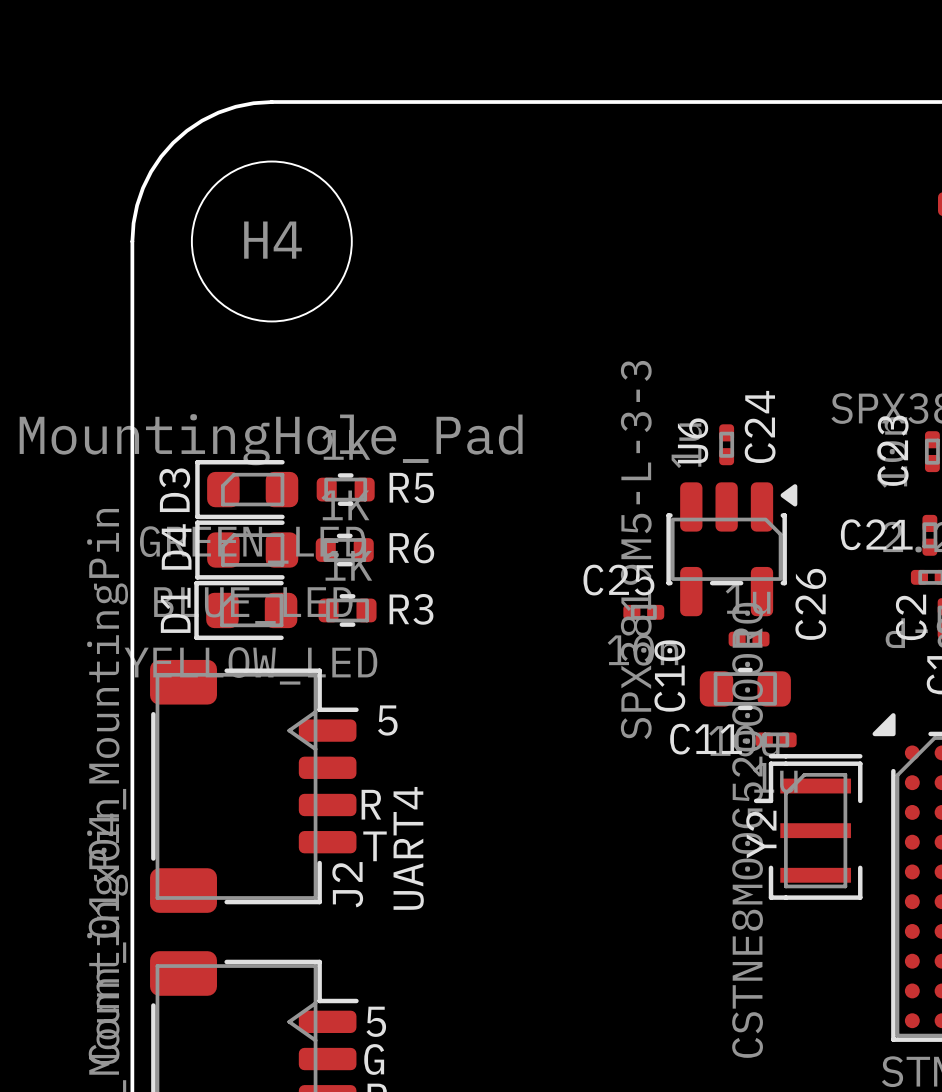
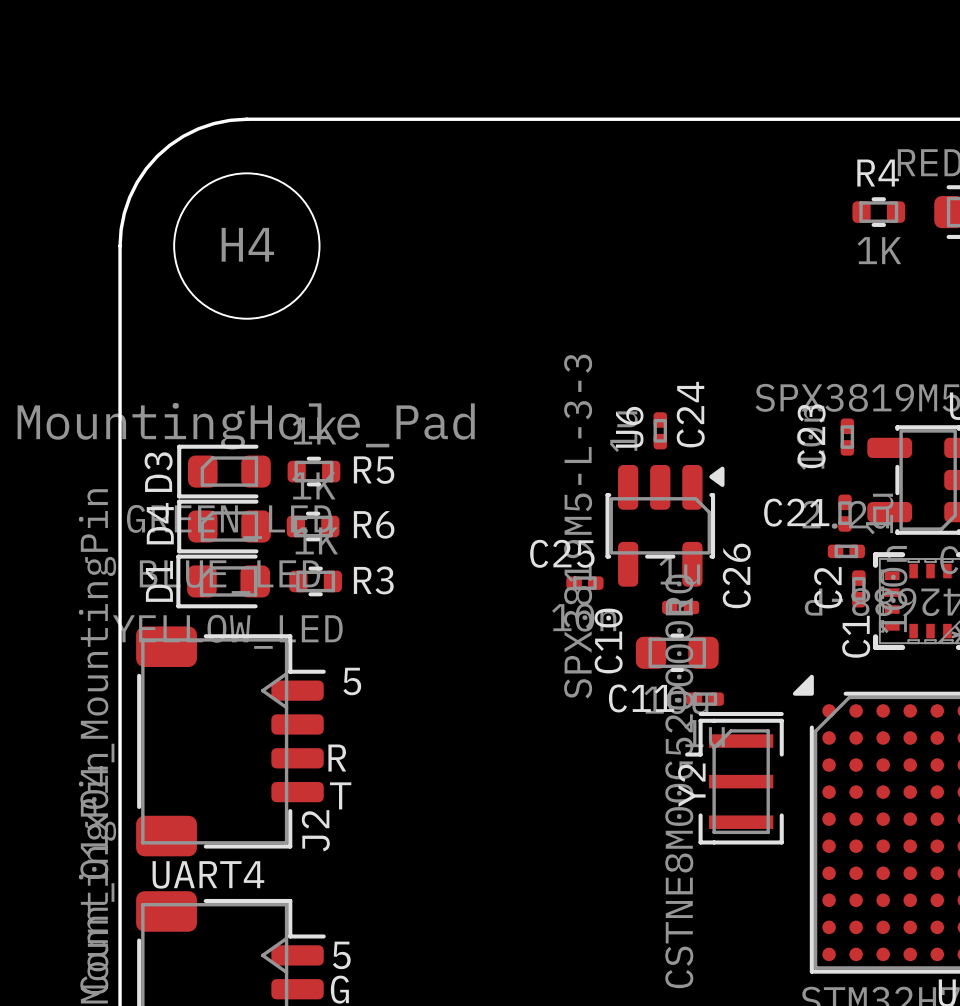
text rotation: 0° (408, 848) -> 90° clockwise (208, 874)
text position: UART4 (408, 848) -> UART4 (208, 874)

